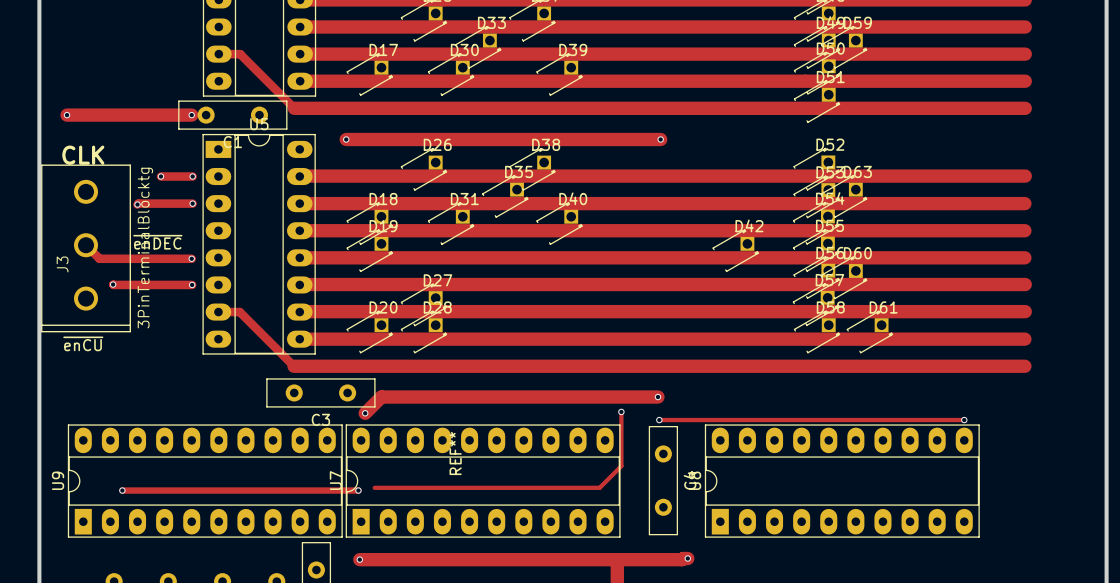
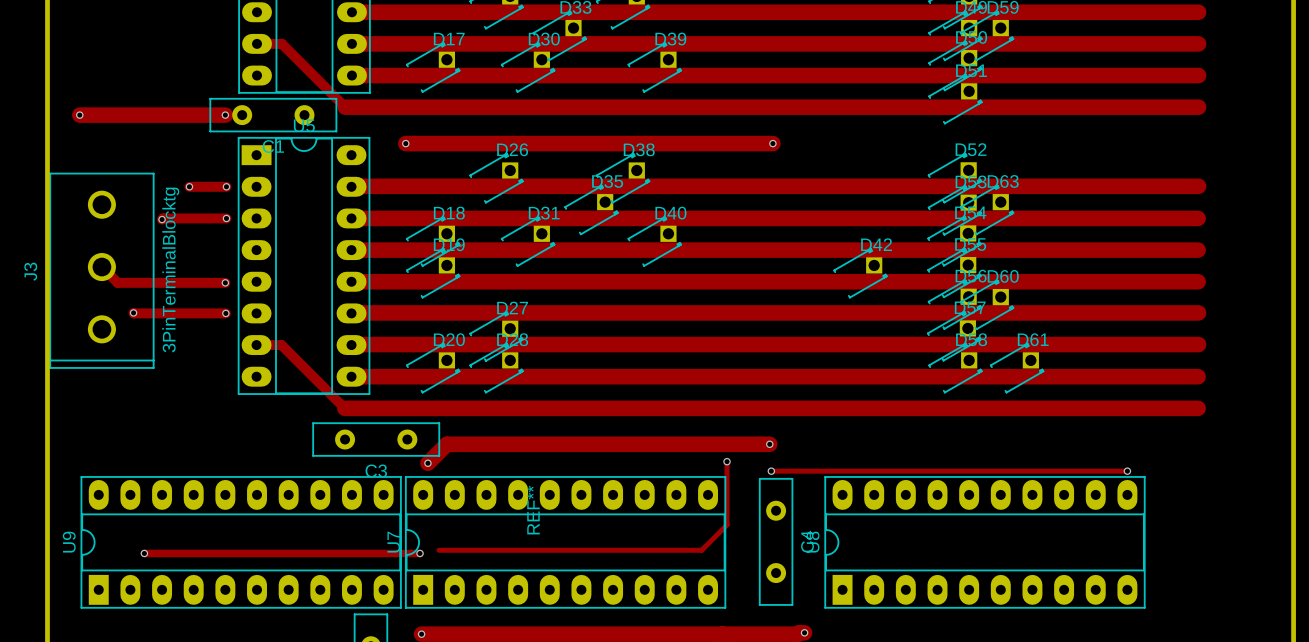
text: CLK (83, 155) -> none
text: ~{enDEC} (157, 242) -> none
J3 name position: J3 (62, 264) -> J3 (30, 271)
text: ~{enCU} (83, 343) -> none

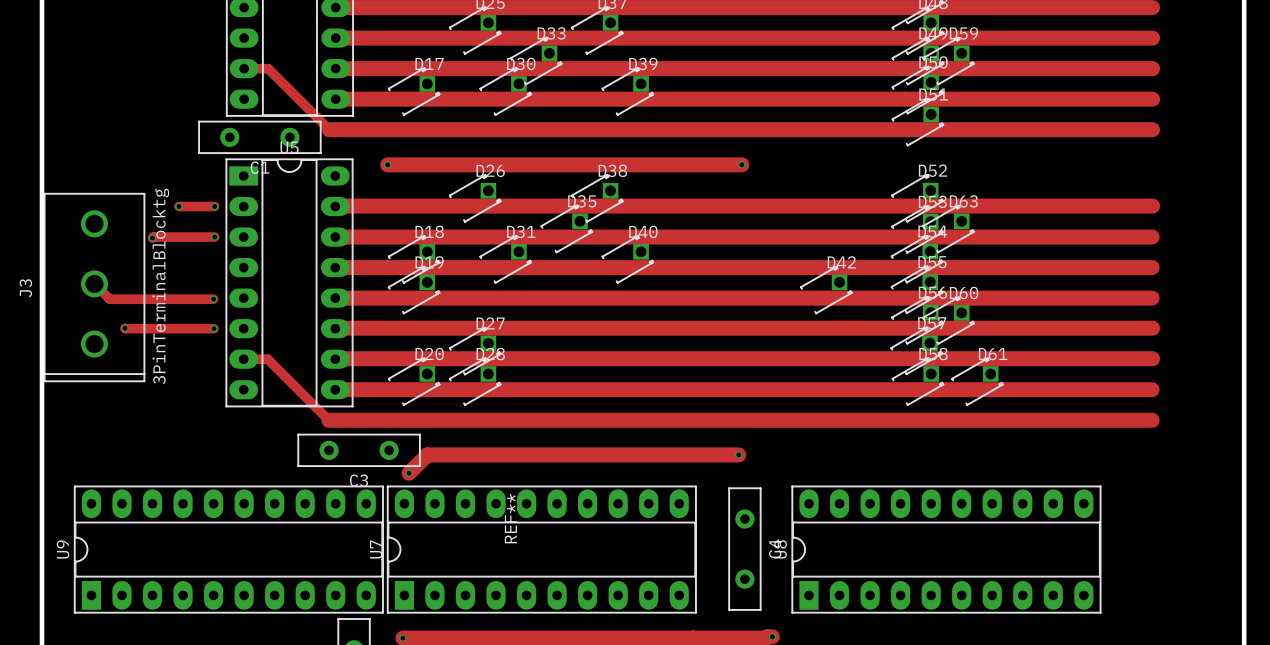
track: (79, 115) (225, 115) -> none
via: (79, 115) -> none
via: (225, 115) -> none
track: (727, 461) (727, 524) (701, 550) (439, 550) -> none
via: (727, 461) -> none
track: (771, 471) (1127, 471) -> none
via: (771, 471) -> none
via: (1127, 471) -> none
track: (144, 553) (420, 553) -> none
via: (144, 553) -> none
via: (420, 553) -> none

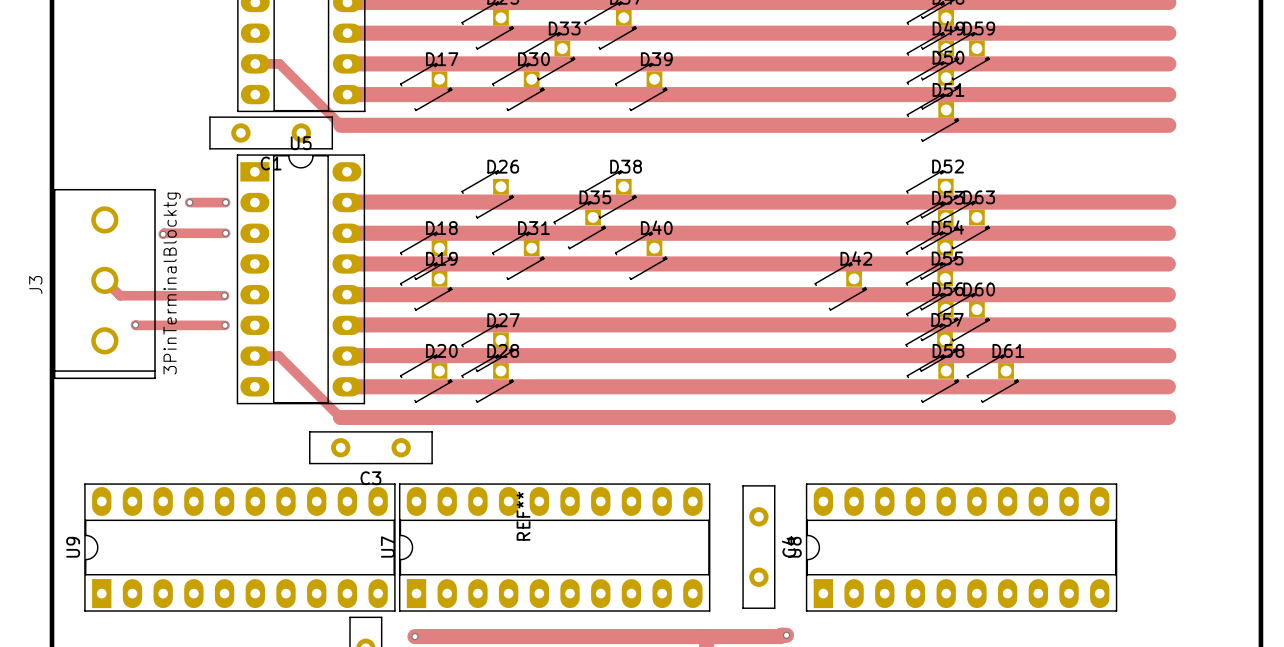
track: (387, 164) (741, 164) -> none
via: (387, 164) -> none
via: (741, 164) -> none
track: (738, 454) (427, 454) (409, 473) -> none
via: (738, 454) -> none
via: (409, 473) -> none

